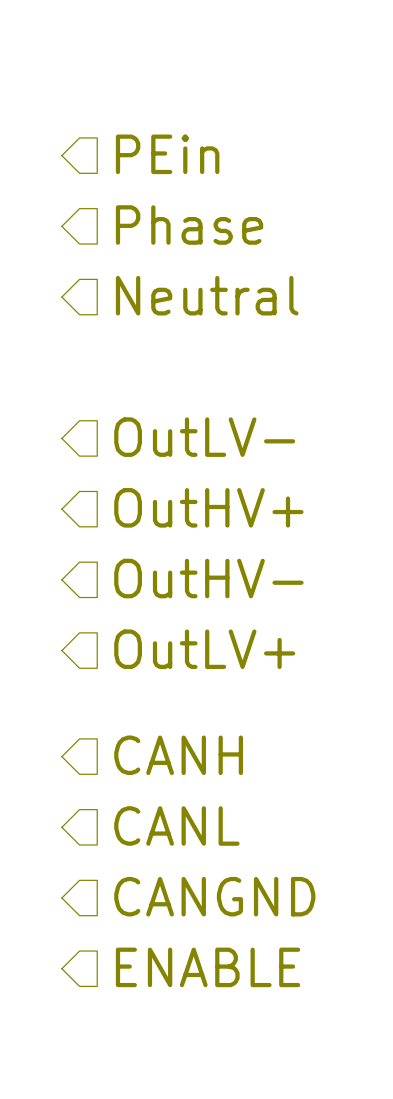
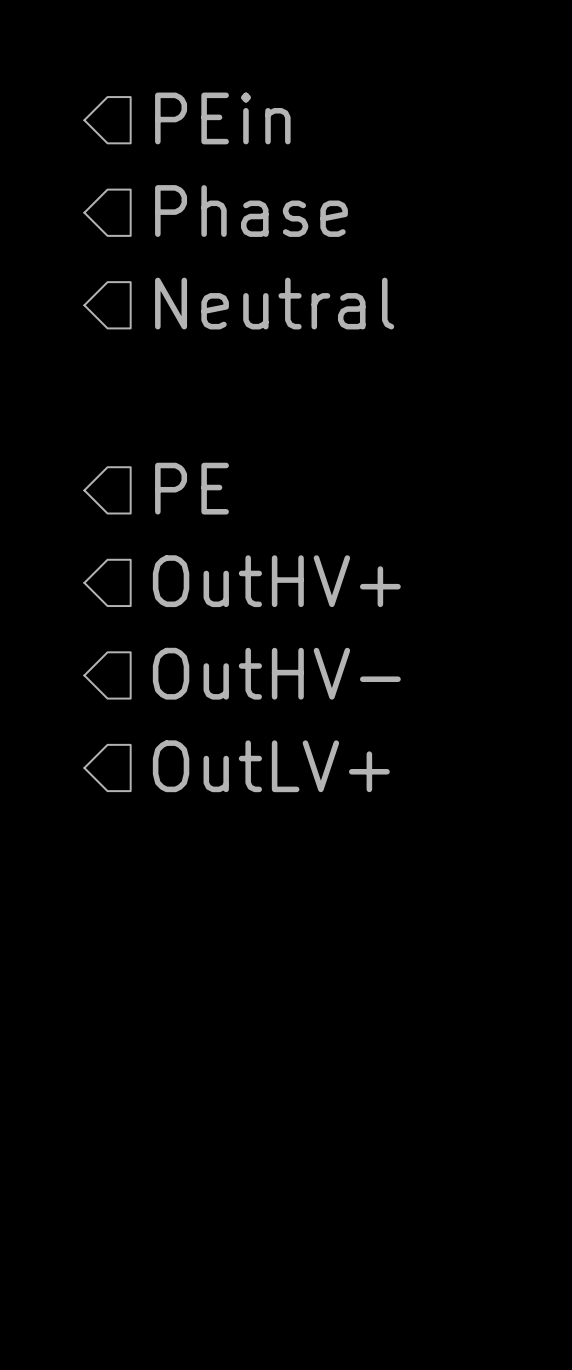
hierarchical label: OutLV- (204, 437) -> PE (191, 488)
hierarchical label: CANH (178, 755) -> none
hierarchical label: CANL (176, 825) -> none
hierarchical label: CANGND (214, 896) -> none
hierarchical label: ENABLE (208, 967) -> none

